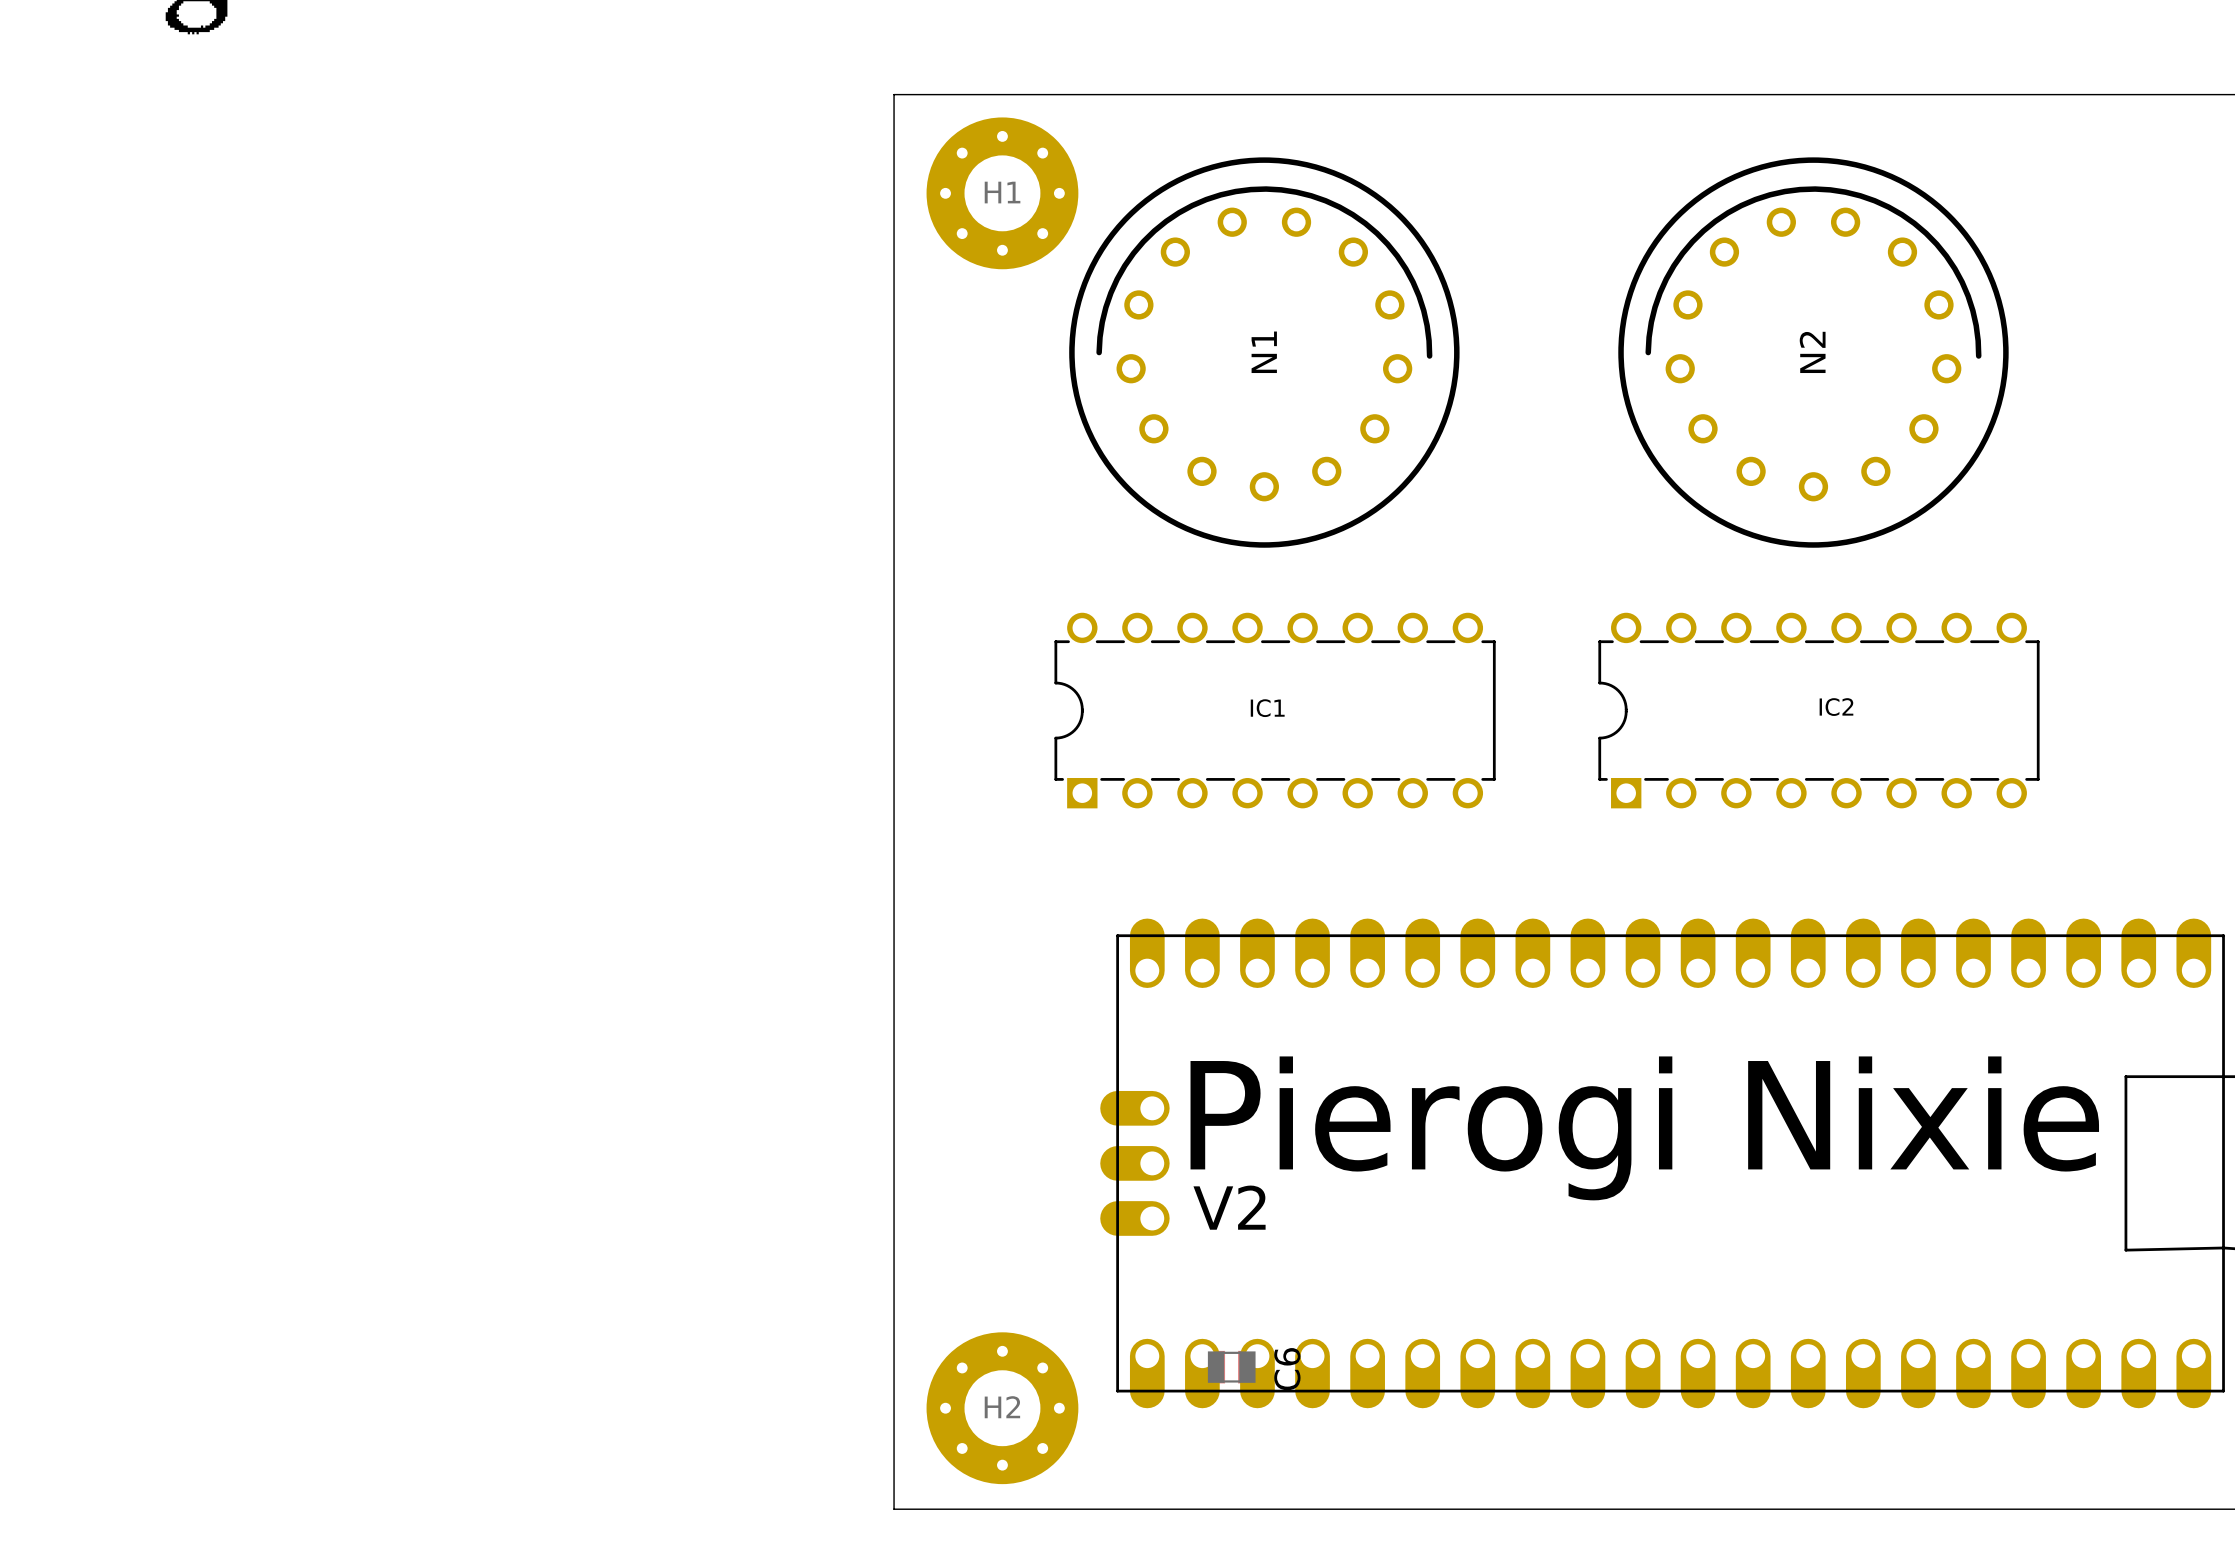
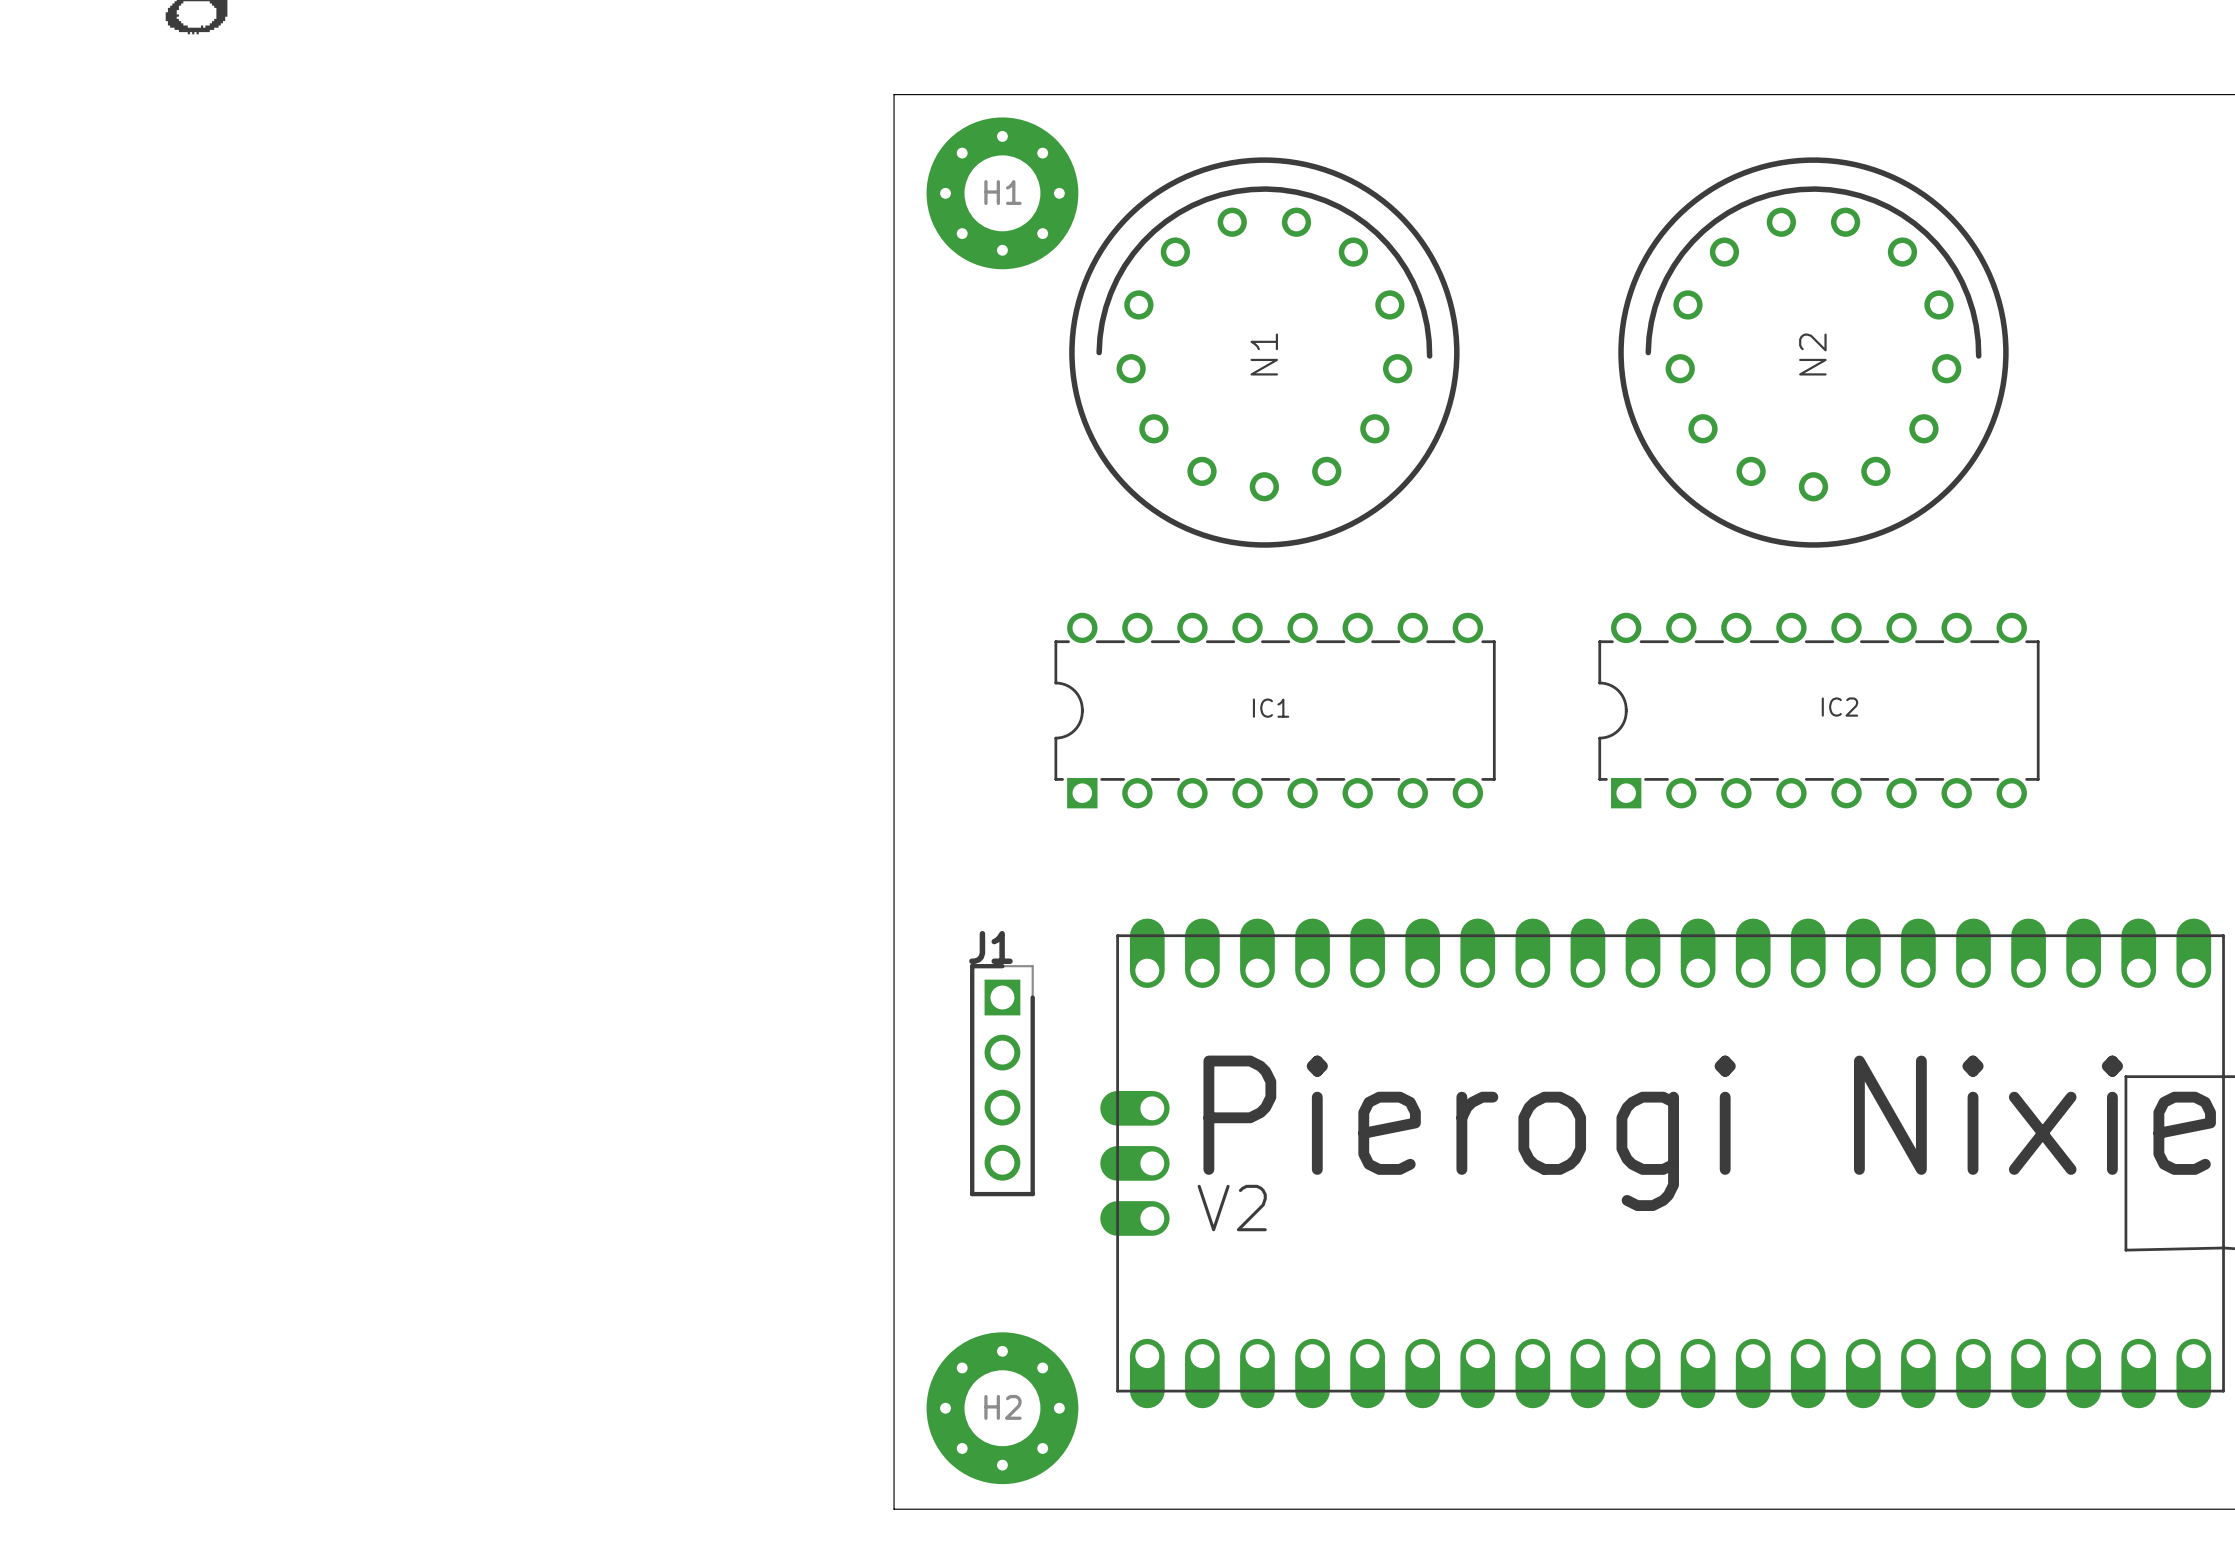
J1: none -> (1002, 1080)
C6: (1231, 1367) -> none

